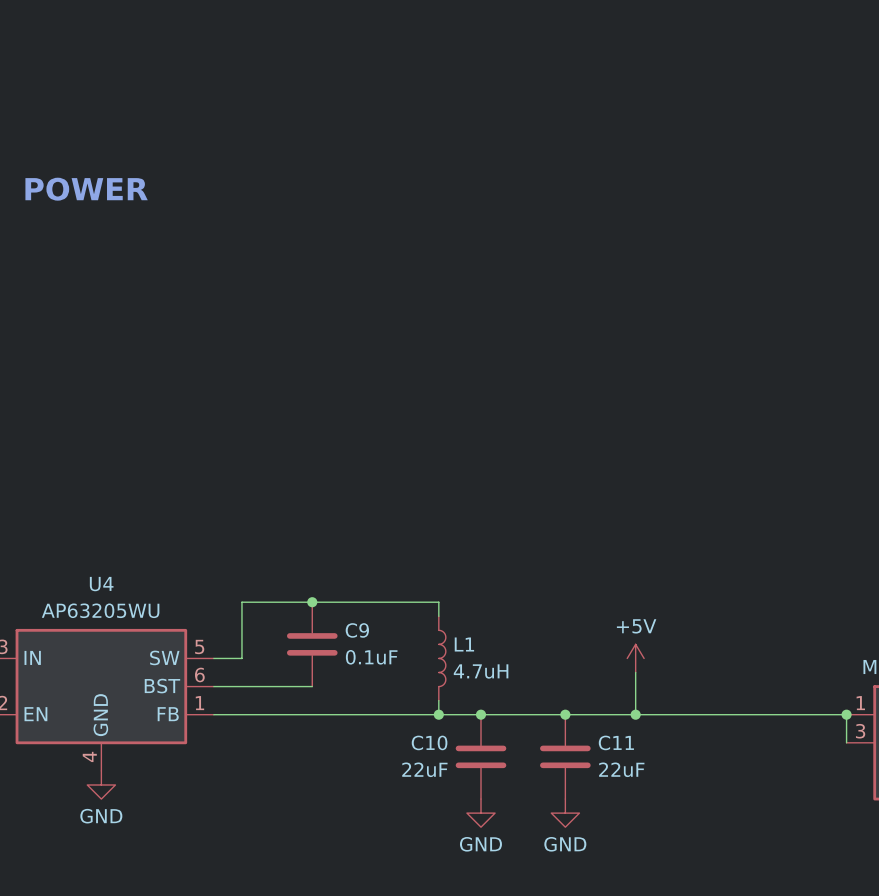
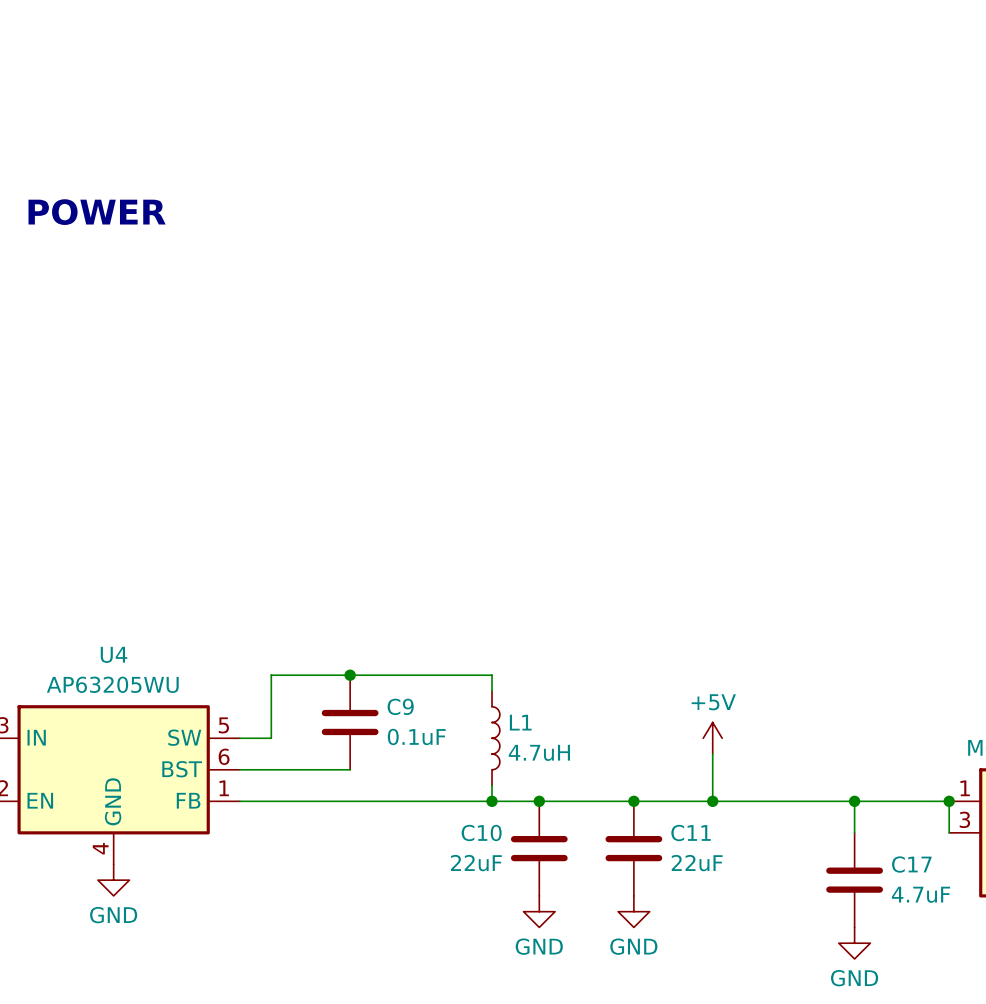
wire: none -> (854, 801) (854, 832)
junction: none -> (854, 801)
C17: none -> 4.7uF (854, 880)
power symbol: none -> GND (854, 943)

